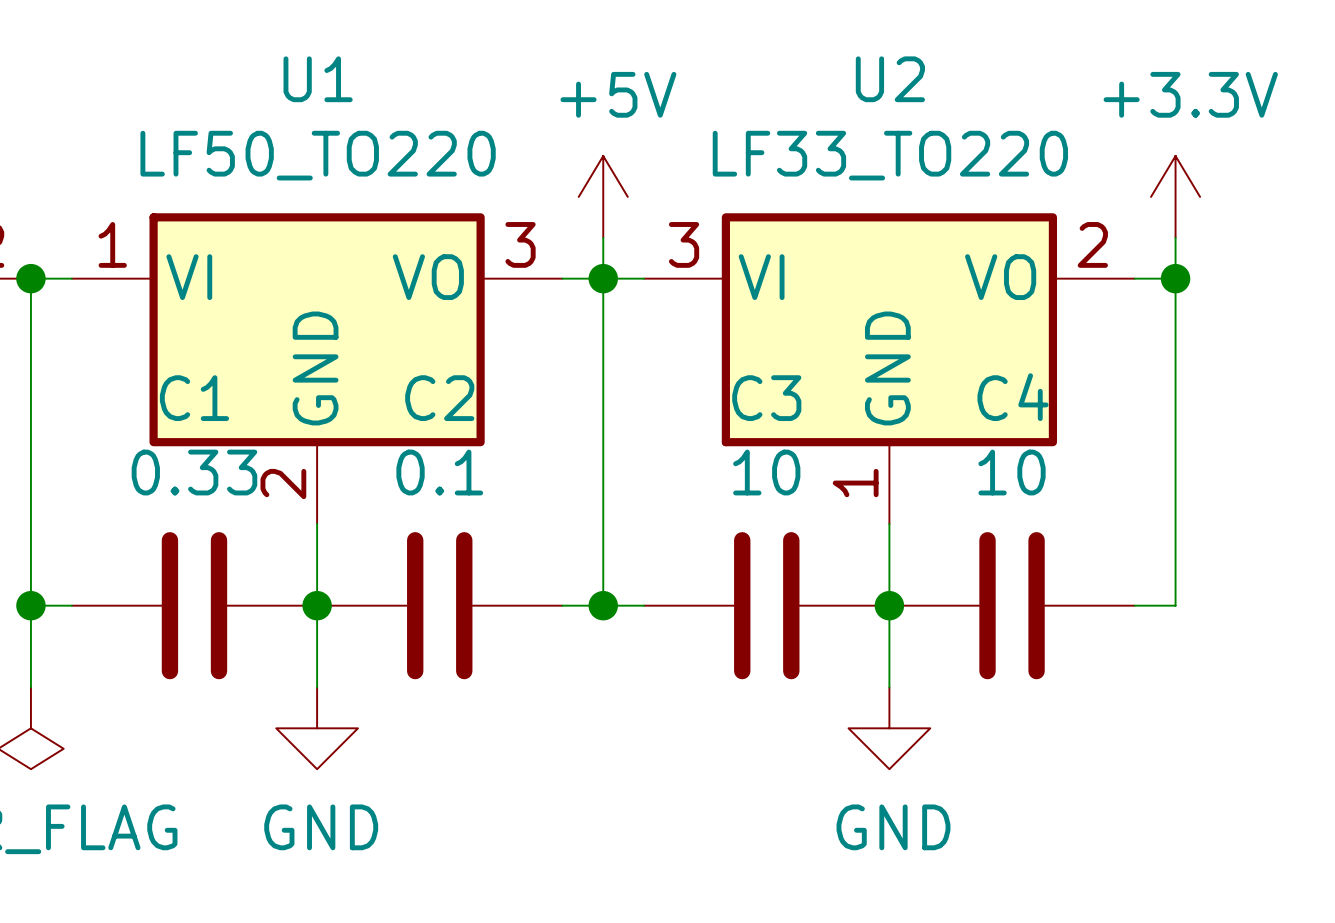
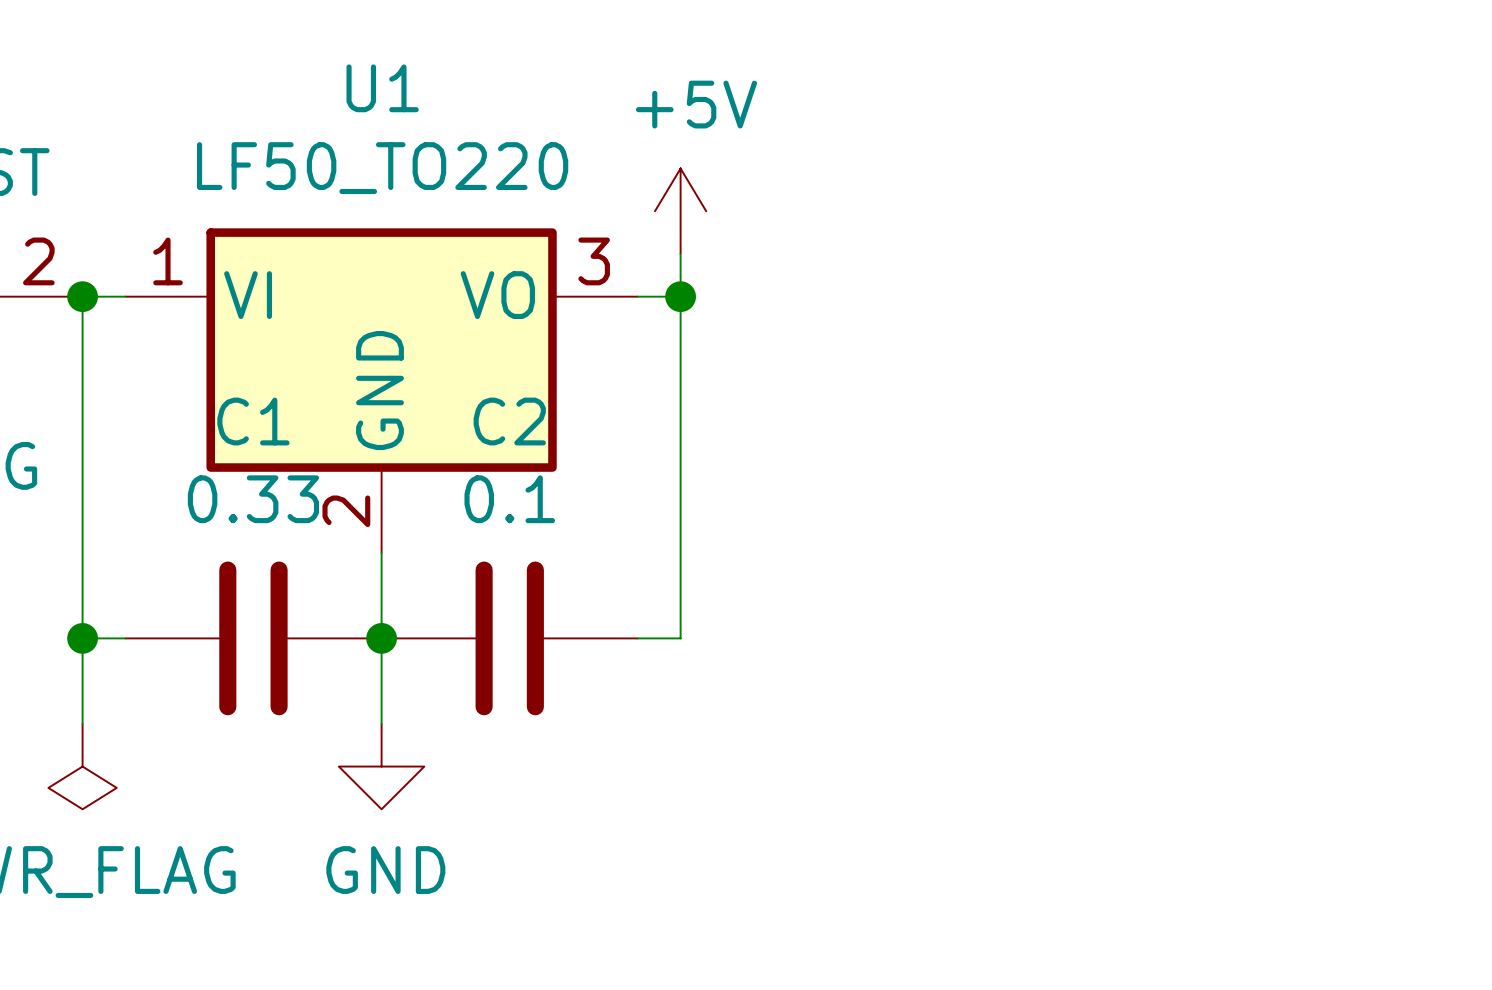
power symbol: +3.3V (1175, 196) -> none
wire: (1175, 237) (1175, 605) (1134, 605) -> none
wire: (603, 278) (644, 278) -> none
wire: (1134, 278) (1175, 278) -> none
junction: (1175, 278) -> none
U2: LF33_TO220 (889, 368) -> none
wire: (889, 523) (889, 687) -> none
wire: (603, 605) (644, 605) -> none
junction: (603, 605) -> none
C3: 10 (766, 605) -> none
junction: (889, 605) -> none
C4: 10 (1012, 605) -> none
power symbol: GND (889, 728) -> none

